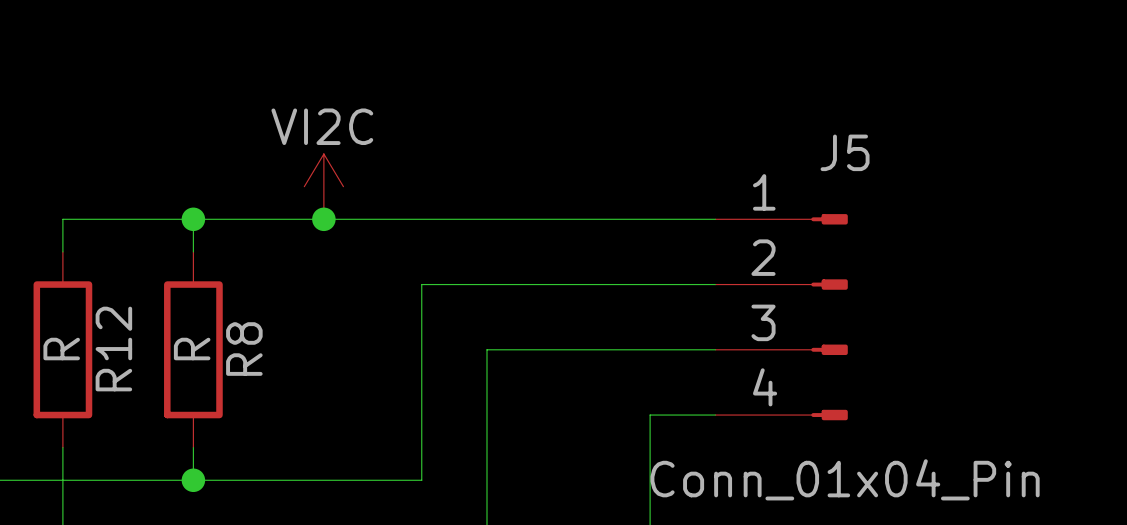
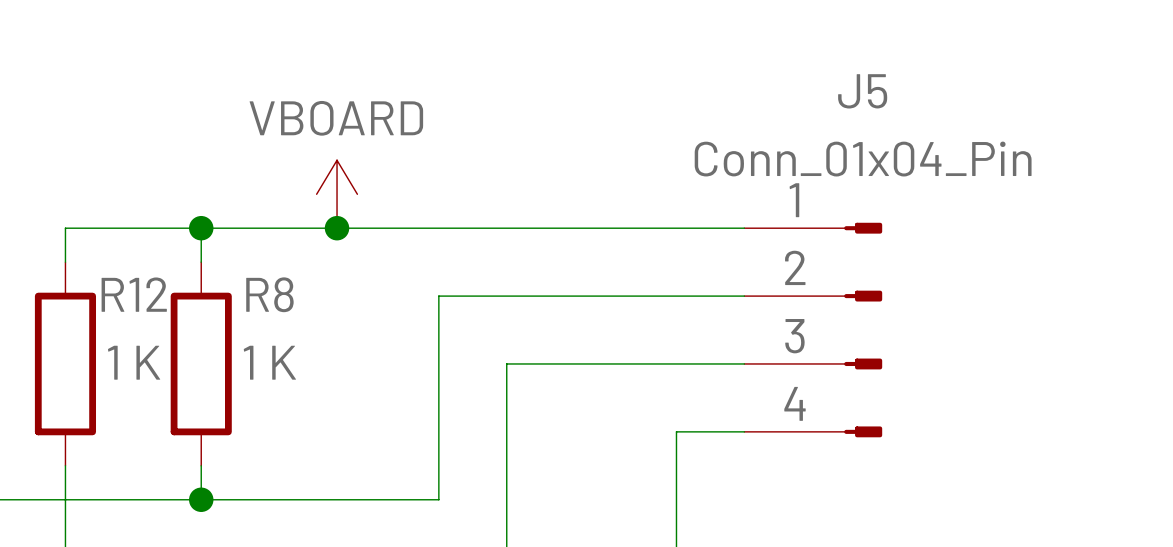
J5 name position: J5 (845, 152) -> J5 (862, 91)
power symbol: VI2C (323, 186) -> VBOARD (337, 194)
R12 value: R (61, 349) -> 1 K (134, 362)
R12 name rotation: 0° (113, 349) -> 90° clockwise (134, 294)
R8 value: R (192, 349) -> 1 K (269, 362)
R8 name rotation: 0° (244, 349) -> 90° clockwise (269, 294)
J5 value position: Conn_01x04_Pin (845, 479) -> Conn_01x04_Pin (863, 159)

